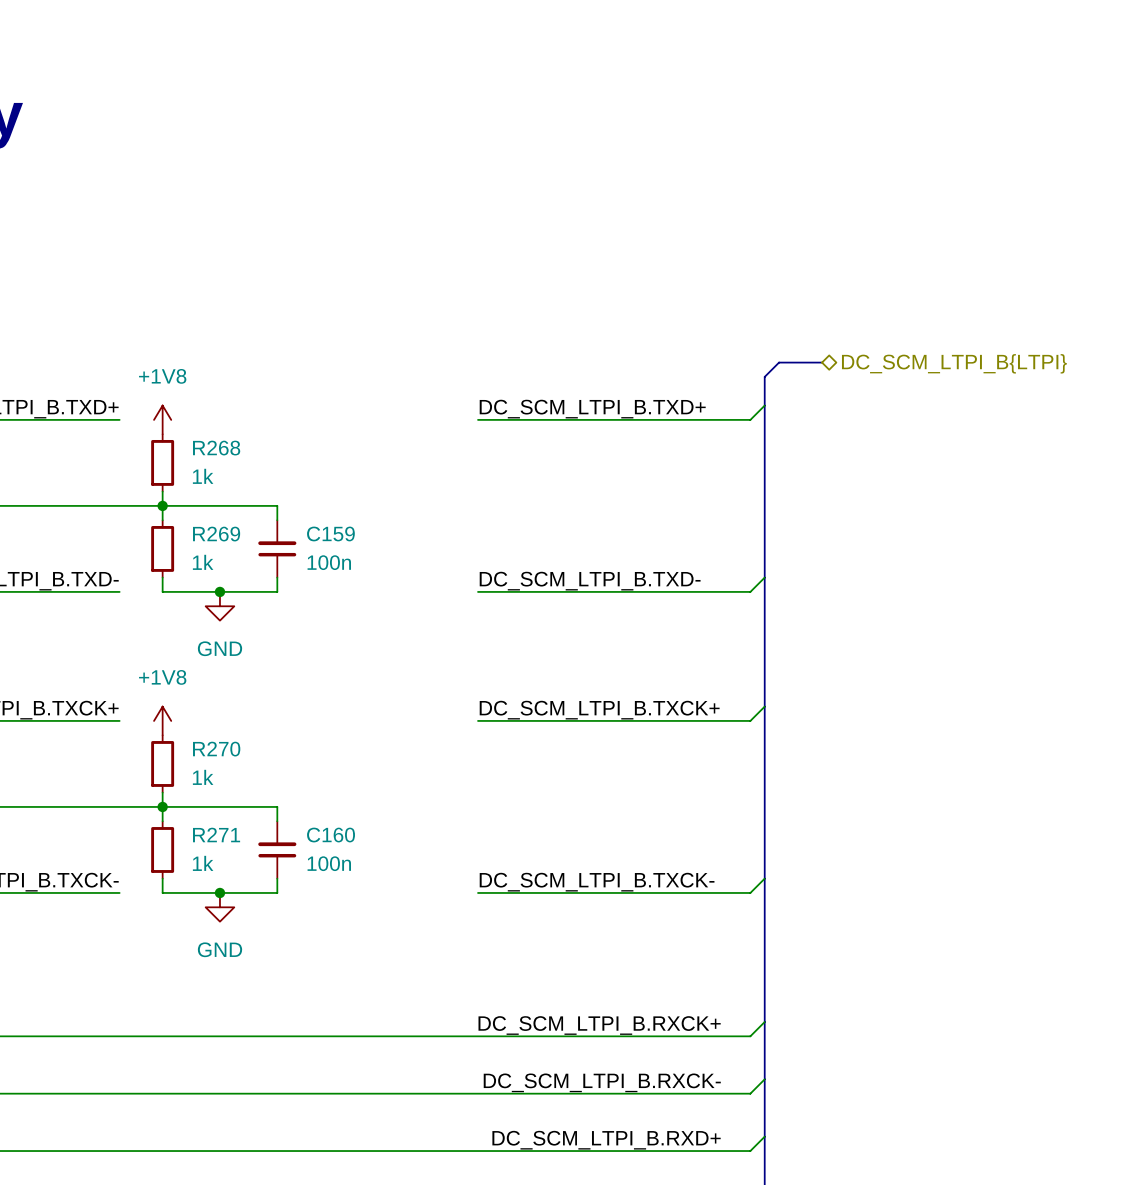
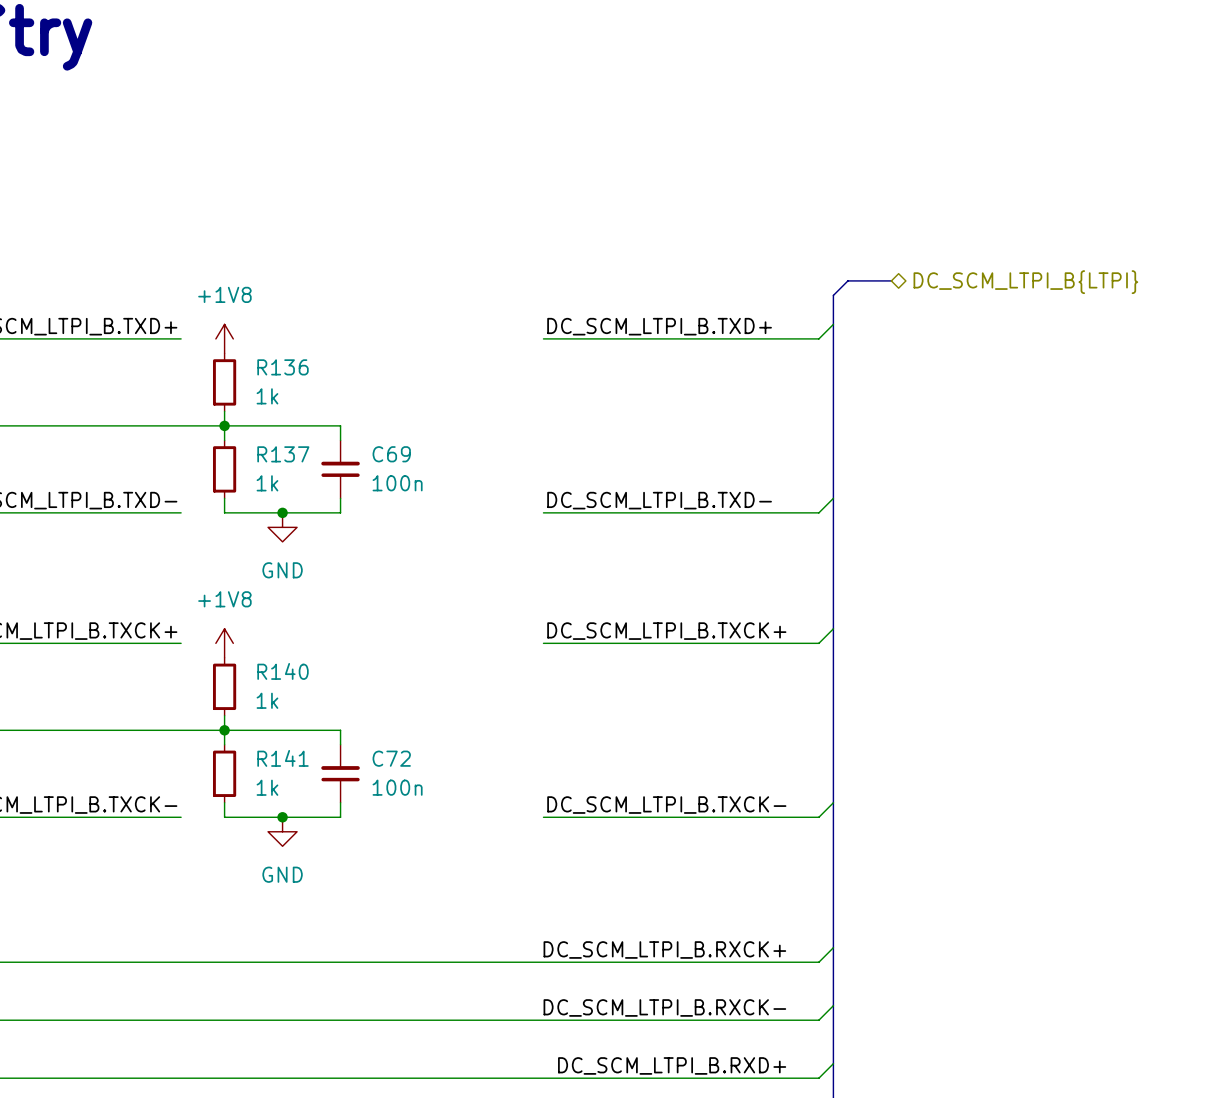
R268 name: R268 (216, 448) -> R136 (283, 367)
C159 name: C159 (330, 533) -> C69 (391, 454)
R269 name: R269 (216, 534) -> R137 (283, 454)
R270 name: R270 (216, 749) -> R140 (283, 671)
R271 name: R271 (216, 835) -> R141 (283, 758)
C160 name: C160 (331, 835) -> C72 (391, 758)

